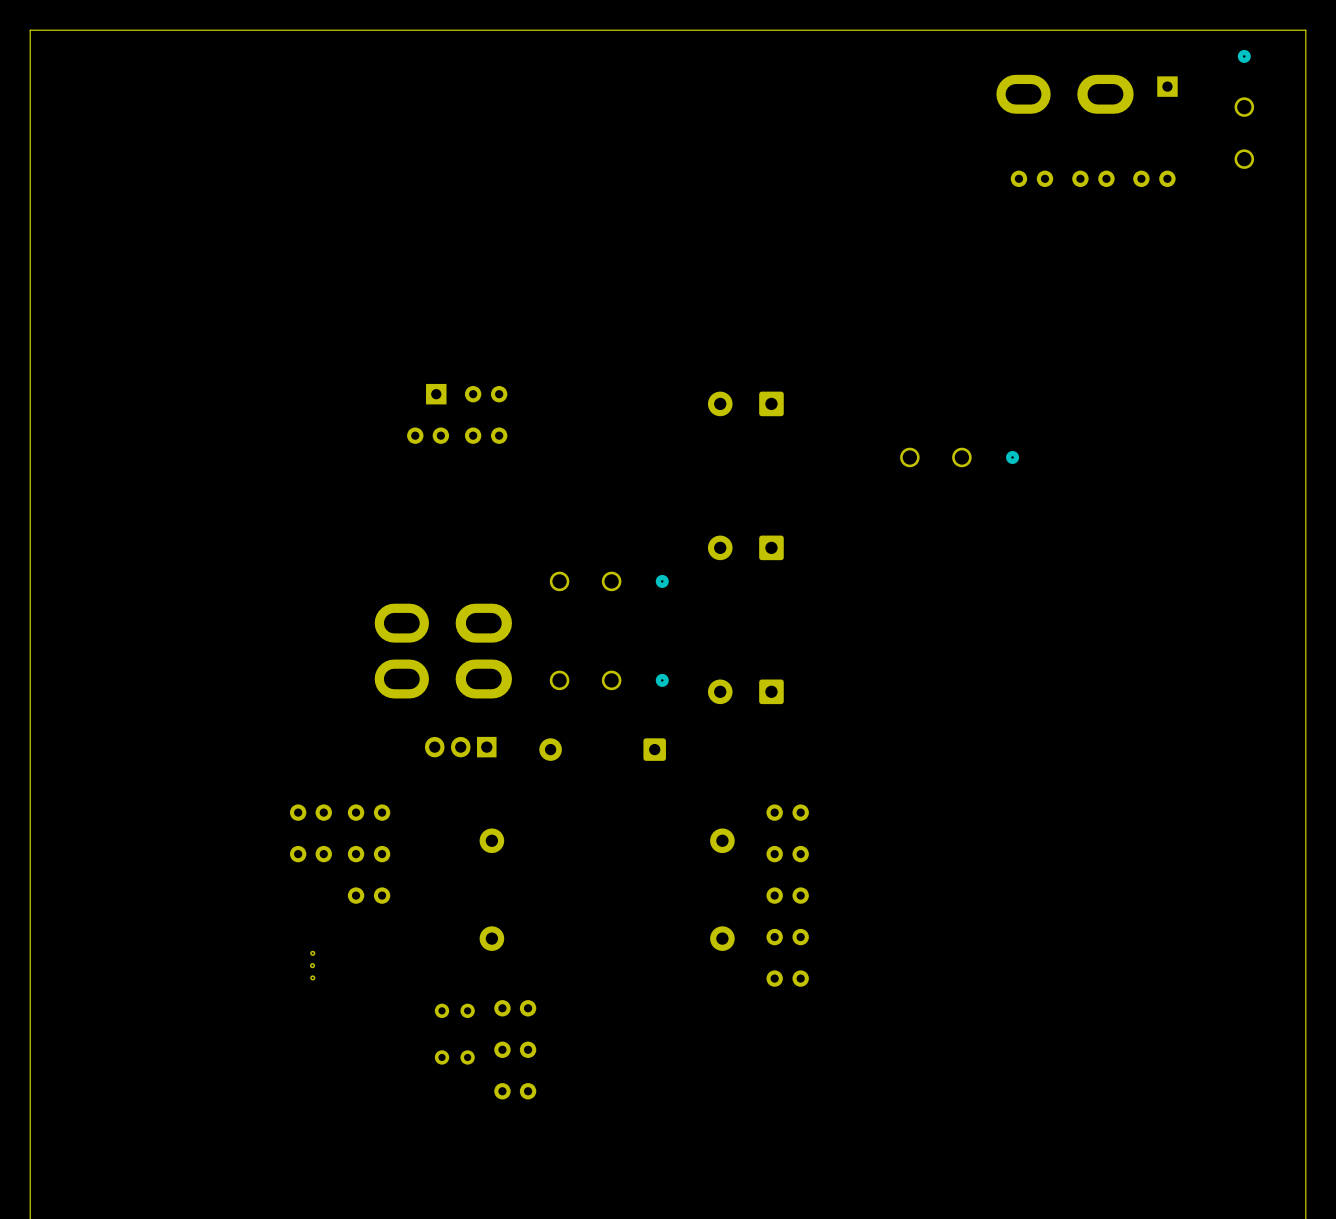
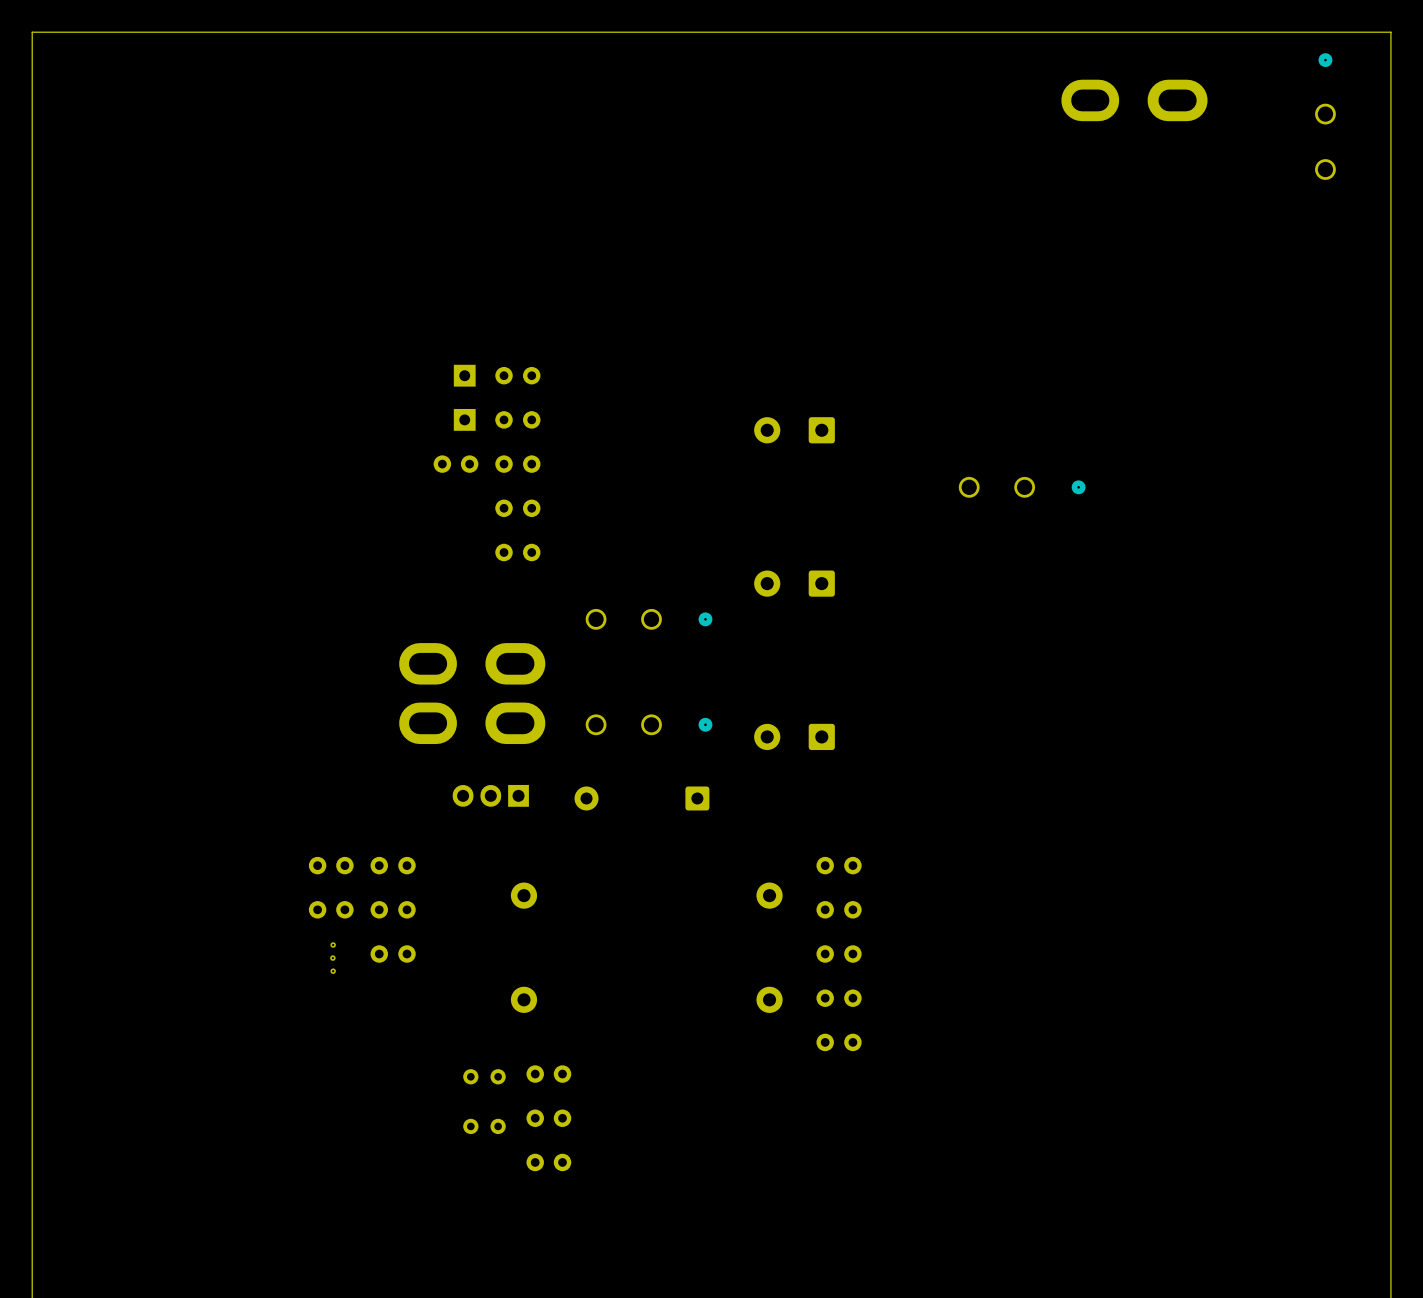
part: (1167, 86) -> none
part: (1031, 178) -> none
part: (1093, 178) -> none
part: (1154, 178) -> none
part: none -> (464, 375)
part: none -> (517, 375)
part: none -> (517, 508)
part: none -> (517, 552)
part position: (312, 965) -> (333, 958)

